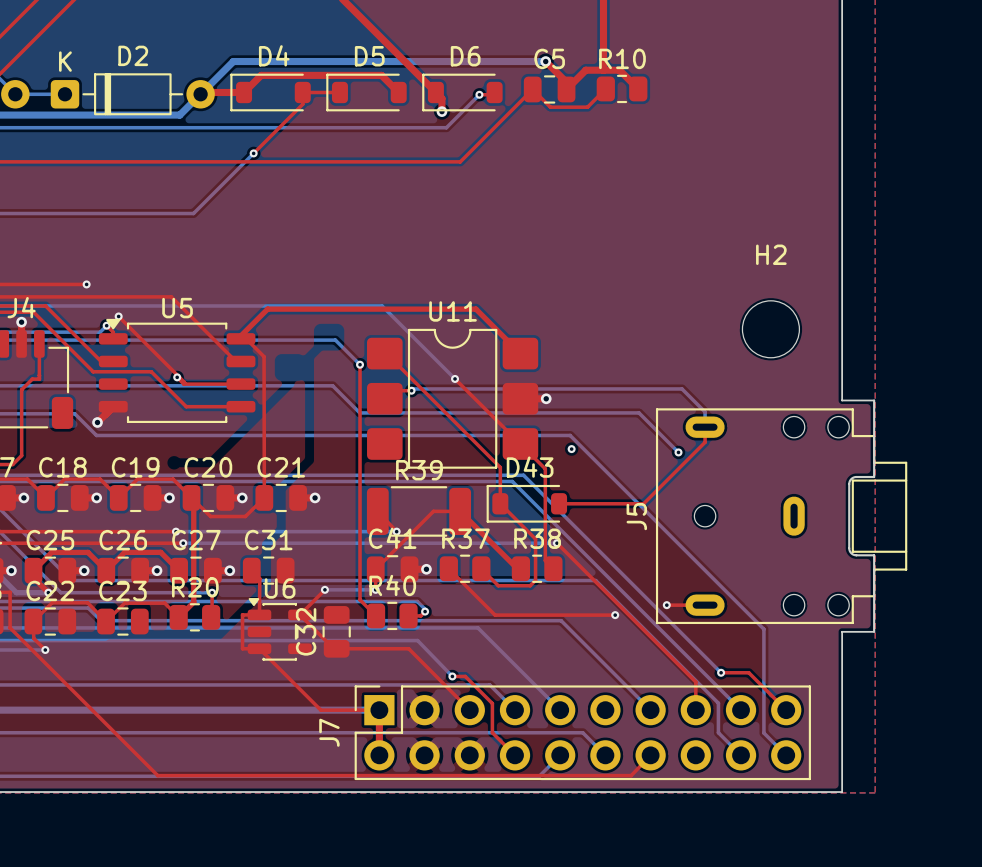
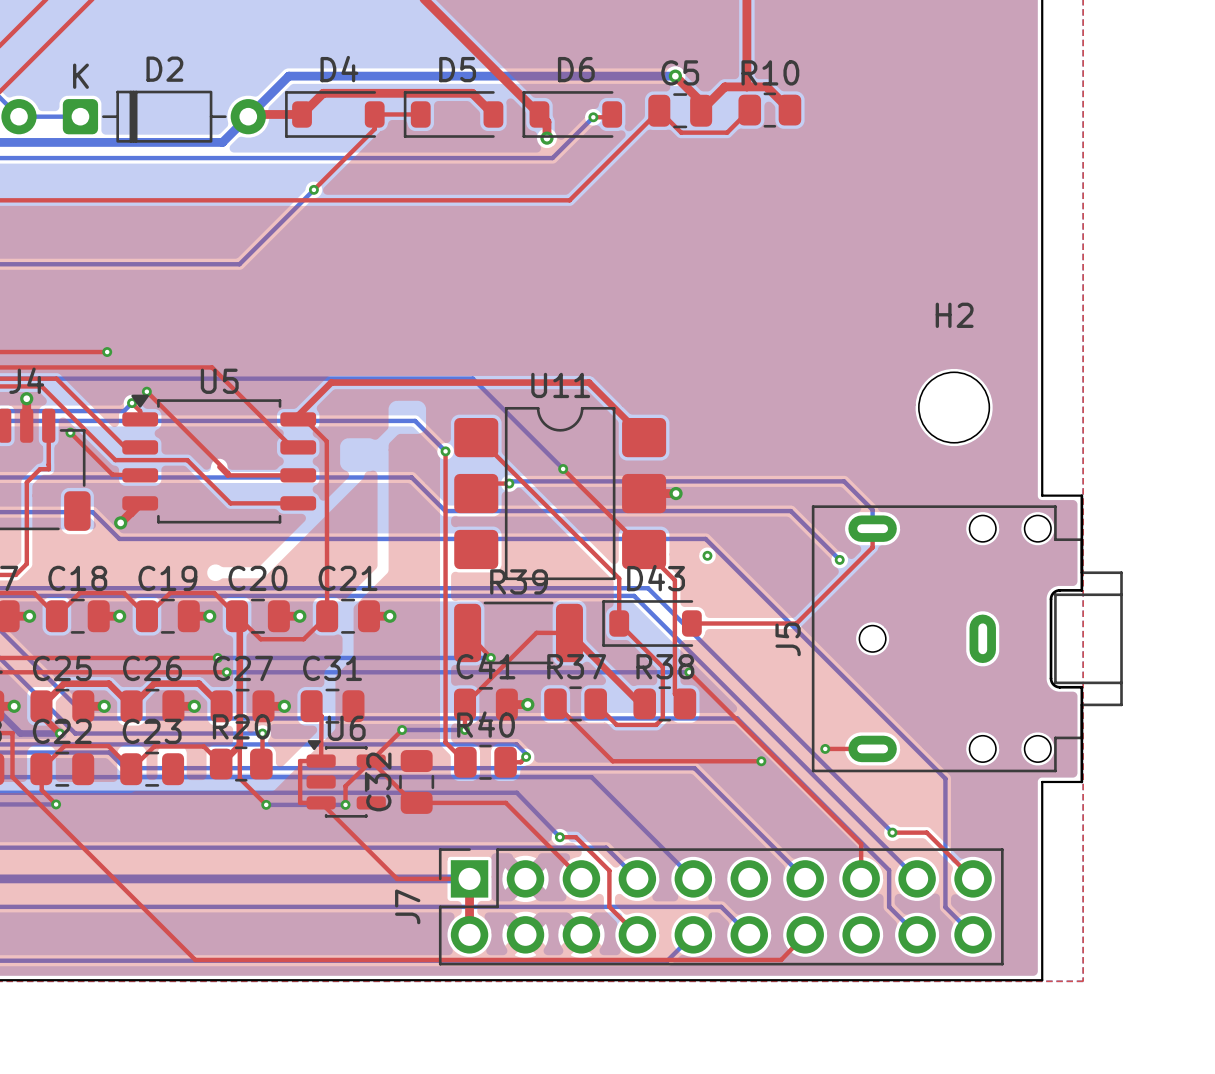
top track: none -> (70, 432) (112, 474) (140, 475)
via: none -> (70, 432)
via: (177, 377) -> none
top track: none -> (239, 745) (239, 778) (266, 804)
top track: none -> (371, 761) (345, 786) (345, 804)
bottom track: none -> (266, 804) (345, 804)
via: none -> (266, 804)
via: none -> (345, 804)

